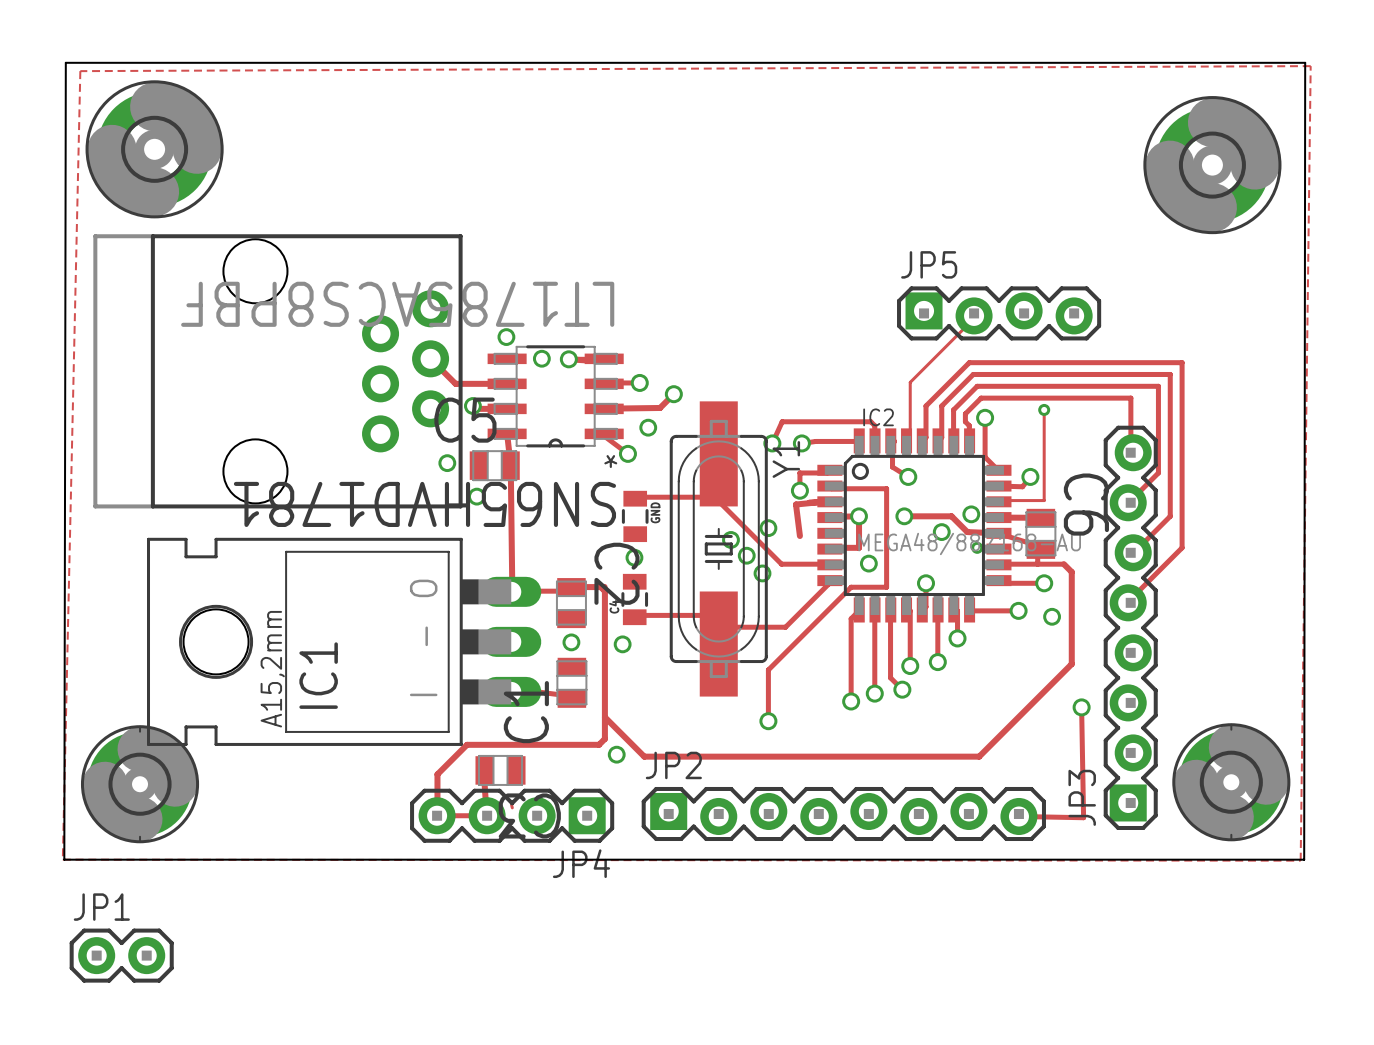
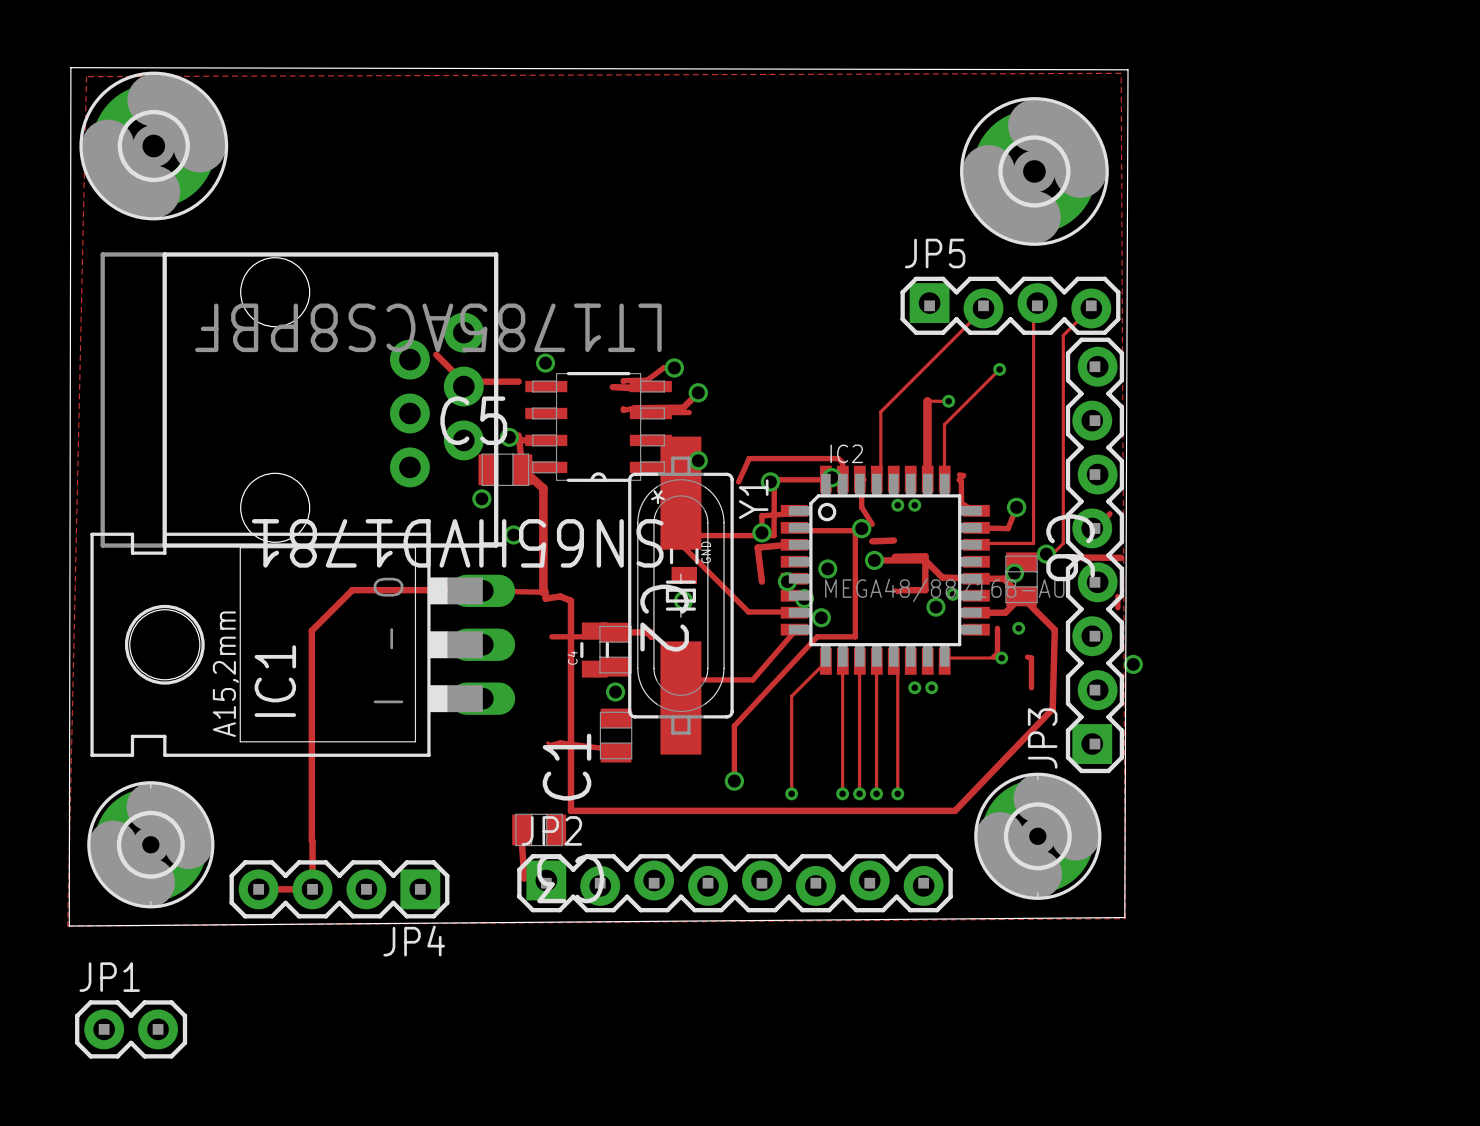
board edge: (65, 62) (1305, 62) (1304, 859) (64, 859) -> (70, 67) (1128, 69) (1124, 917) (69, 926)
zone outline: (80, 71) (1310, 66) (1300, 860) (62, 859) -> (86, 76) (1121, 73) (1125, 918) (67, 926)
part position: (154, 149) -> (153, 146)
part position: (1212, 165) -> (1034, 171)
track: none -> (1037, 303) (1033, 305) (1033, 543) (976, 544)
track: none -> (983, 308) (880, 411) (880, 475) (876, 479)
track: none -> (1091, 308) (1063, 335) (1063, 543) (1050, 556)
JP5 position: (999, 313) -> (1010, 305)
track: (974, 315) (973, 319) (910, 382) (910, 437) (906, 440) -> none
track: none -> (674, 367) (663, 367) (647, 380) (623, 381)
via: none -> (674, 367)
track: none -> (999, 369) (944, 424) (944, 479)
via: none -> (999, 369)
track: (430, 358) (455, 383) (507, 383) -> (436, 354) (463, 381) (518, 381)
via: (541, 358) -> none
via: (568, 359) -> none
via: none -> (698, 392)
track: none -> (948, 401) (927, 401) (927, 479)
via: none -> (948, 401)
via: (639, 382) -> none
track: (673, 394) (660, 407) (614, 408) (604, 410) (604, 408) -> (698, 392) (683, 407) (634, 408) (623, 410) (623, 408)
via: (673, 394) -> none
track: none -> (517, 435) (522, 469) (543, 488) (543, 592) (352, 590) (311, 630) (312, 889) (258, 889)
track: (1044, 409) (1044, 500) (998, 501) -> none
via: (1044, 409) -> none
track: (985, 417) (985, 457) (998, 470) -> none
via: (985, 417) -> none
track: (604, 433) (604, 436) (627, 453) -> none
track: (505, 434) (510, 465) (512, 595) -> none
track: (859, 440) (801, 443) -> none
track: (875, 440) (874, 425) (870, 421) (782, 421) (772, 443) -> none
track: (922, 440) (926, 437) (926, 406) (969, 362) (1182, 362) (1182, 547) (1128, 602) -> none
track: (938, 440) (941, 437) (941, 406) (973, 374) (1170, 374) (1170, 516) (1133, 552) -> none
track: (953, 440) (953, 409) (977, 386) (1158, 386) (1158, 472) (1128, 502) -> none
track: (969, 440) (969, 425) (965, 421) (965, 413) (981, 398) (1130, 398) (1130, 449) (1133, 452) -> none
via: (801, 443) -> none
track: none -> (825, 479) (778, 479) (770, 481)
track: none -> (842, 479) (842, 462) (838, 458) (749, 458) (738, 481)
track: none -> (859, 479) (863, 479) (859, 484) (861, 486) (861, 507) (872, 524)
via: none -> (770, 481)
via: (627, 453) -> none
C5 position: (494, 465) -> (505, 469)
via: none -> (897, 505)
via: none -> (914, 505)
track: (829, 470) (827, 472) (799, 472) (799, 490) -> none
track: none -> (1016, 507) (1008, 528) (976, 527)
via: none -> (1016, 507)
track: none -> (794, 510) (791, 513) (761, 515) (761, 532)
via: (908, 476) -> none
via: (1030, 476) -> none
track: (829, 486) (831, 488) (886, 488) (886, 587) (851, 587) (768, 669) (768, 721) -> none
track: none -> (794, 527) (795, 530) (855, 530) (855, 636) (817, 636) (734, 725) (734, 781)
via: none -> (761, 532)
track: (718, 501) (781, 564) (829, 564) -> none
track: (819, 502) (795, 504) (799, 536) -> (783, 545) (757, 547) (761, 581)
track: none -> (680, 544) (748, 612) (794, 612)
via: (859, 516) -> none
track: (904, 516) (951, 516) (967, 532) (998, 532) (1033, 544) (1037, 553) (1040, 549) -> none
via: (904, 516) -> none
track: none -> (874, 560) (925, 560) (942, 577) (1003, 578) (1054, 629) (1052, 708) (955, 810) (570, 810) (570, 600) (560, 596) (545, 598) (545, 592)
via: none -> (874, 560)
IC2 position: (914, 525) -> (885, 570)
C6 position: (1040, 533) -> (1021, 579)
via: (977, 547) -> none
Y1 position: (718, 548) -> (680, 595)
via: none -> (952, 594)
track: none -> (1021, 596) (1005, 612) (976, 612)
track: (998, 564) (1063, 564) (1071, 572) (1071, 664) (979, 756) (644, 756) (604, 717) -> none
track: (829, 580) (828, 583) (785, 627) (718, 627) (718, 644) -> none
track: (998, 580) (1000, 583) (1044, 583) -> none
via: (926, 583) -> none
via: none -> (1018, 628)
via: (1044, 583) -> none
track: none -> (794, 629) (752, 679) (680, 679) (680, 698)
track: (604, 591) (604, 738) (599, 744) (467, 744) (437, 774) (437, 815) (487, 815) -> none
C4 position: (634, 599) -> (594, 650)
track: (859, 610) (851, 618) (851, 701) -> none
track: (875, 610) (874, 693) -> none
track: (890, 610) (890, 677) (902, 689) -> none
track: (906, 610) (910, 610) (910, 666) -> none
track: none -> (1001, 658) (948, 658) (944, 661)
via: none -> (1001, 658)
track: (938, 610) (937, 662) -> none
track: (969, 610) (1018, 610) -> none
via: (1018, 610) -> none
track: none -> (825, 661) (791, 696) (791, 793)
track: none -> (842, 661) (842, 793)
track: none -> (859, 661) (859, 793)
track: none -> (876, 661) (876, 793)
track: none -> (893, 661) (897, 662) (897, 793)
track: (718, 615) (635, 615) (634, 617) -> none
JP3 position: (1130, 627) -> (1094, 555)
via: none -> (914, 687)
via: none -> (931, 687)
via: (957, 638) -> none
IC1 position: (344, 641) -> (302, 644)
via: (622, 644) -> none
via: (937, 662) -> none
via: (910, 666) -> none
via: (902, 689) -> none
via: (874, 693) -> none
via: (851, 701) -> none
track: (1081, 707) (1083, 817) (1018, 816) -> none
via: (1081, 707) -> none
via: (768, 721) -> none
via: none -> (734, 781)
via: none -> (791, 793)
via: none -> (842, 793)
via: none -> (859, 793)
via: none -> (876, 793)
via: none -> (897, 793)
via: (616, 754) -> none
part position: (1231, 782) -> (1037, 836)
track: (511, 805) (512, 807) -> none
JP2 position: (843, 813) -> (734, 883)
JP4 position: (512, 815) -> (339, 889)

